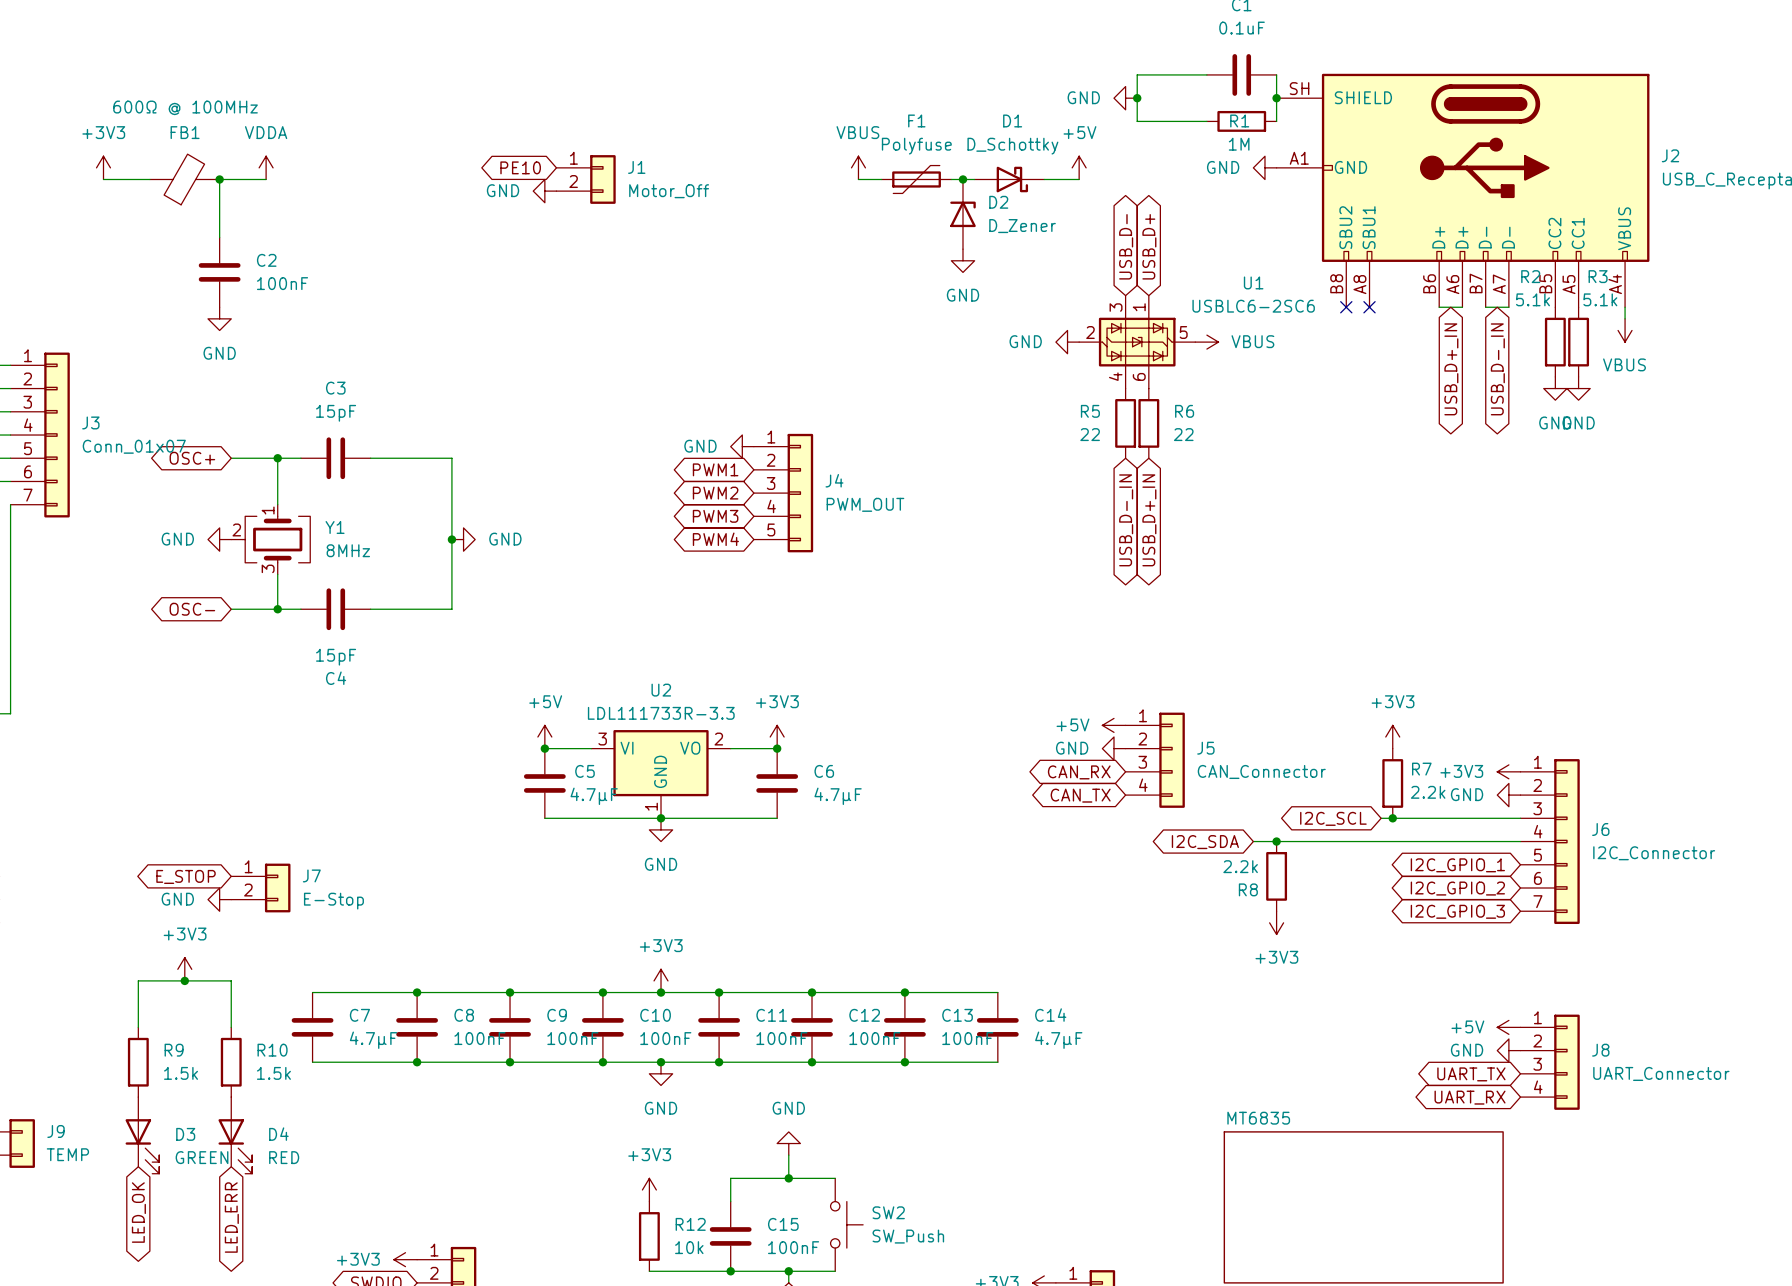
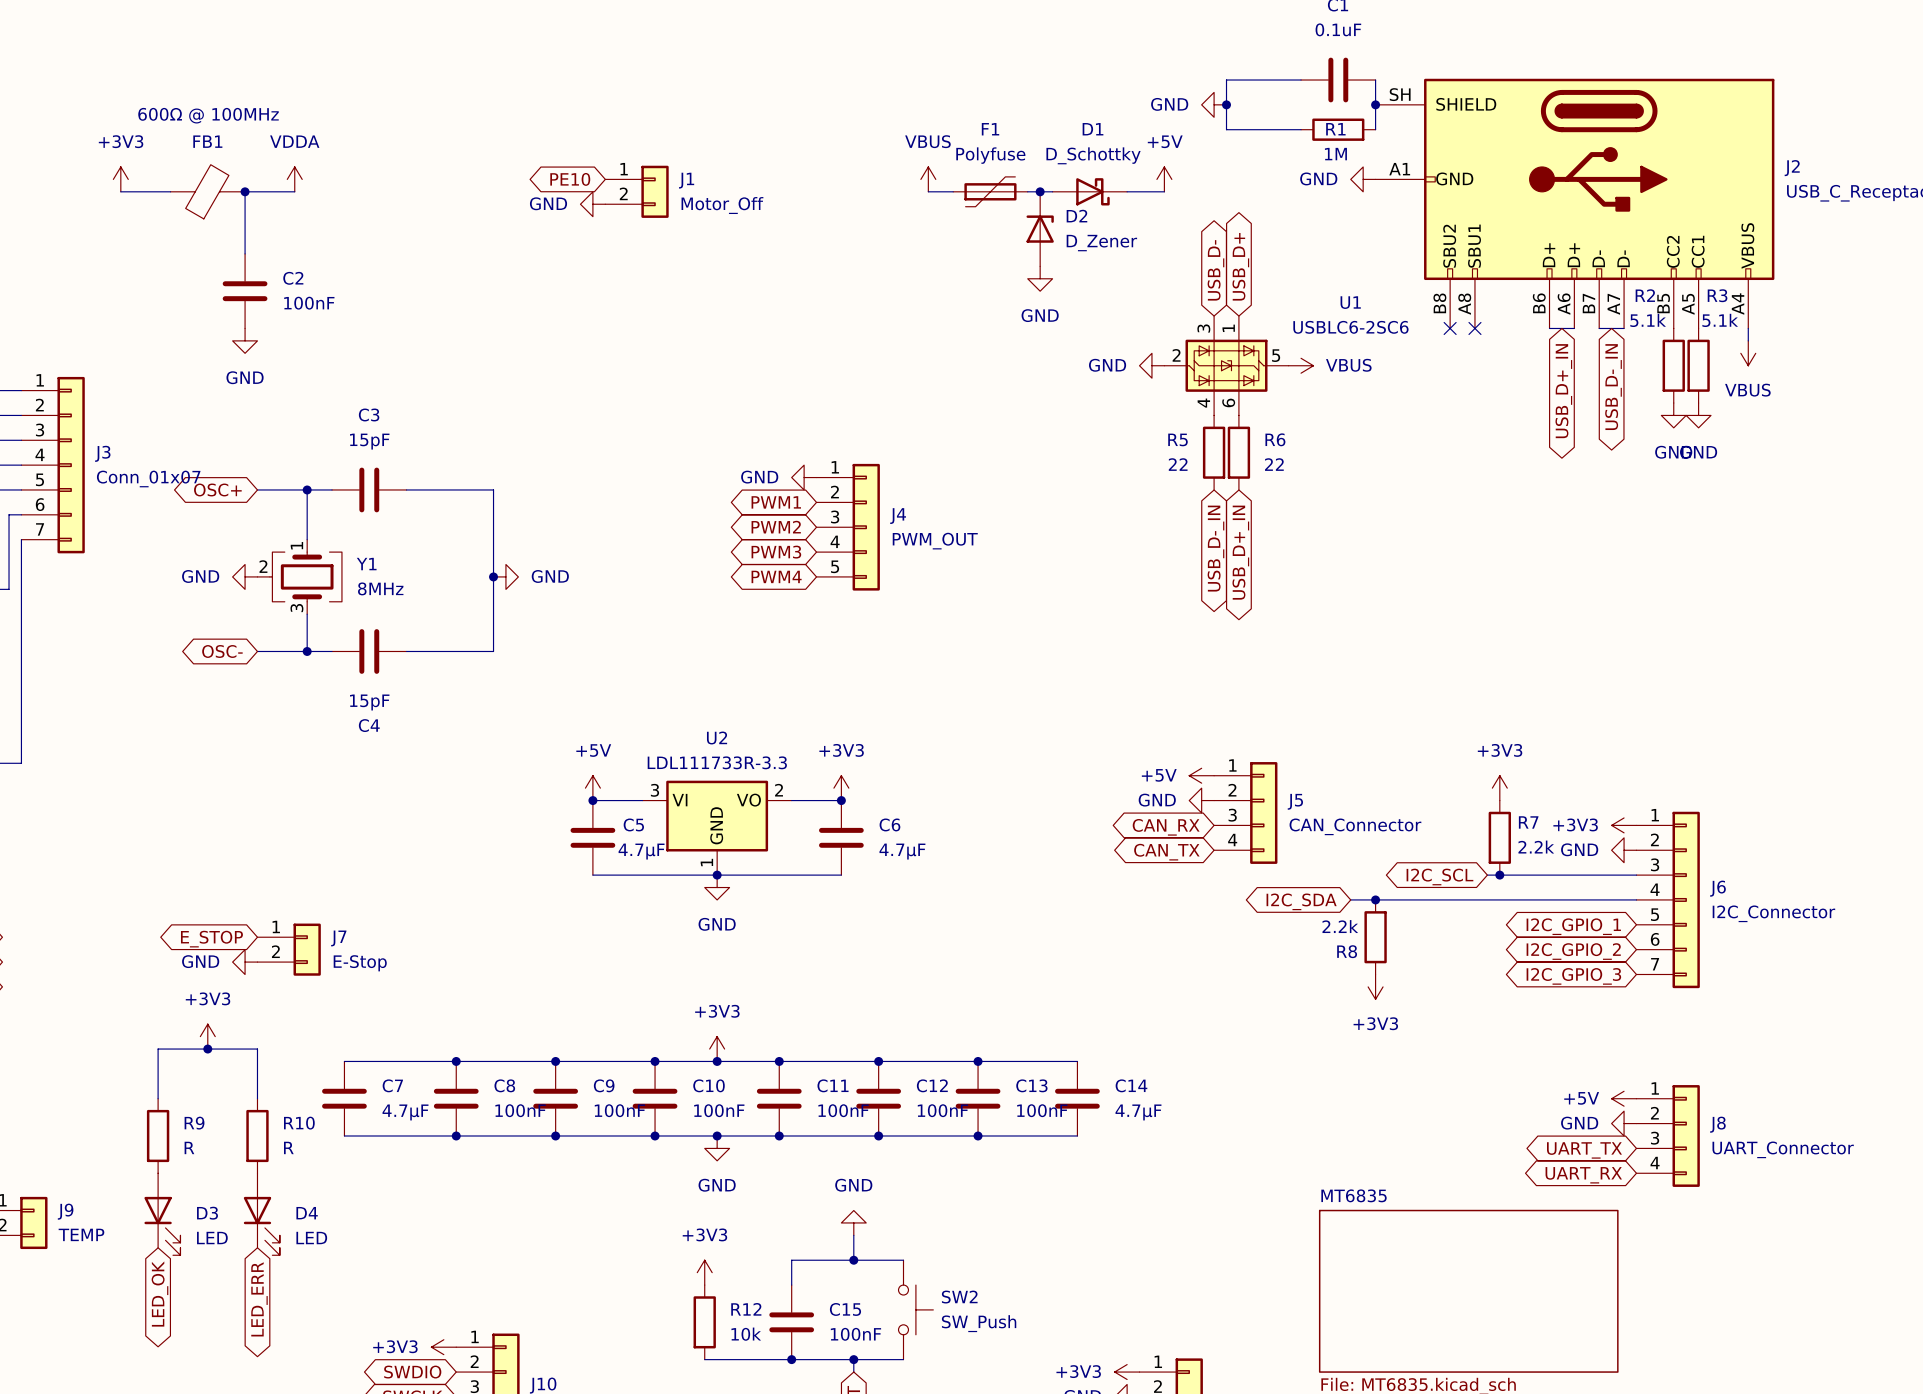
R9 value: 1.5k (181, 1073) -> R (189, 1147)
R10 value: 1.5k (273, 1073) -> R (288, 1147)
D3 value: GREEN (202, 1157) -> LED (212, 1238)
D4 value: RED (284, 1157) -> LED (311, 1238)

